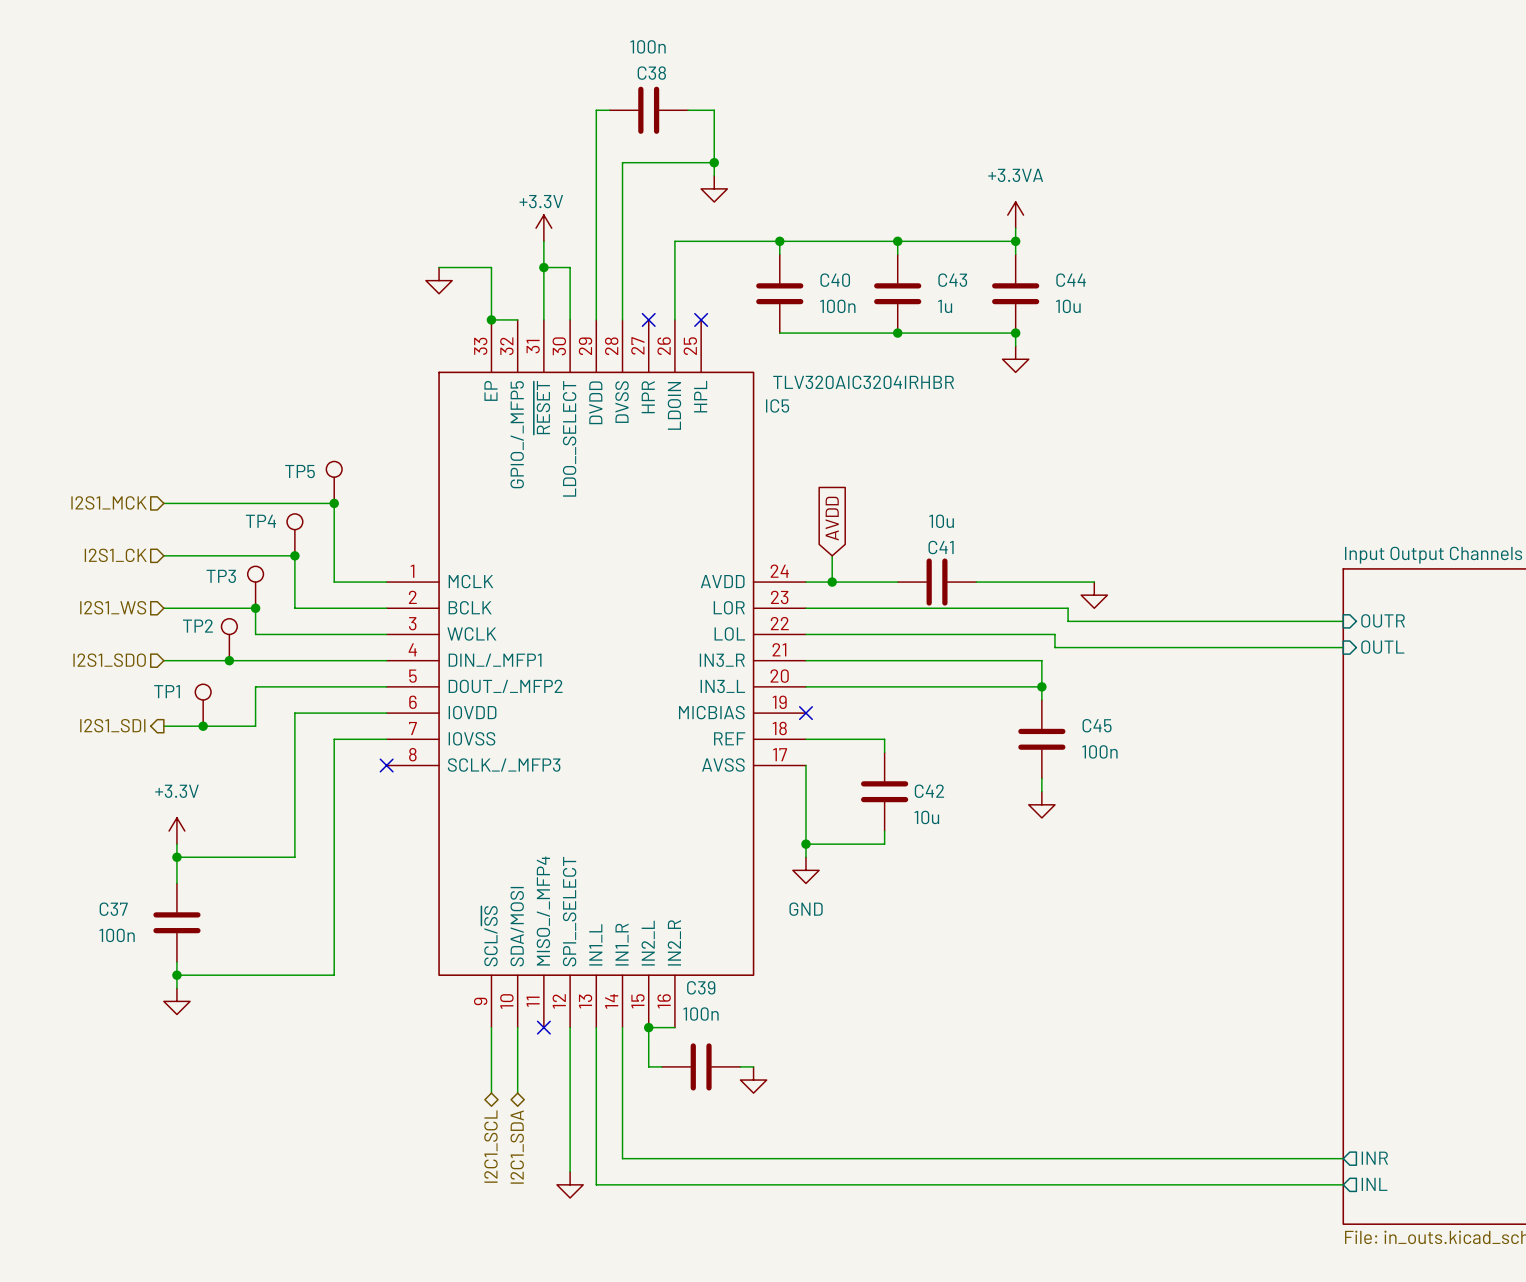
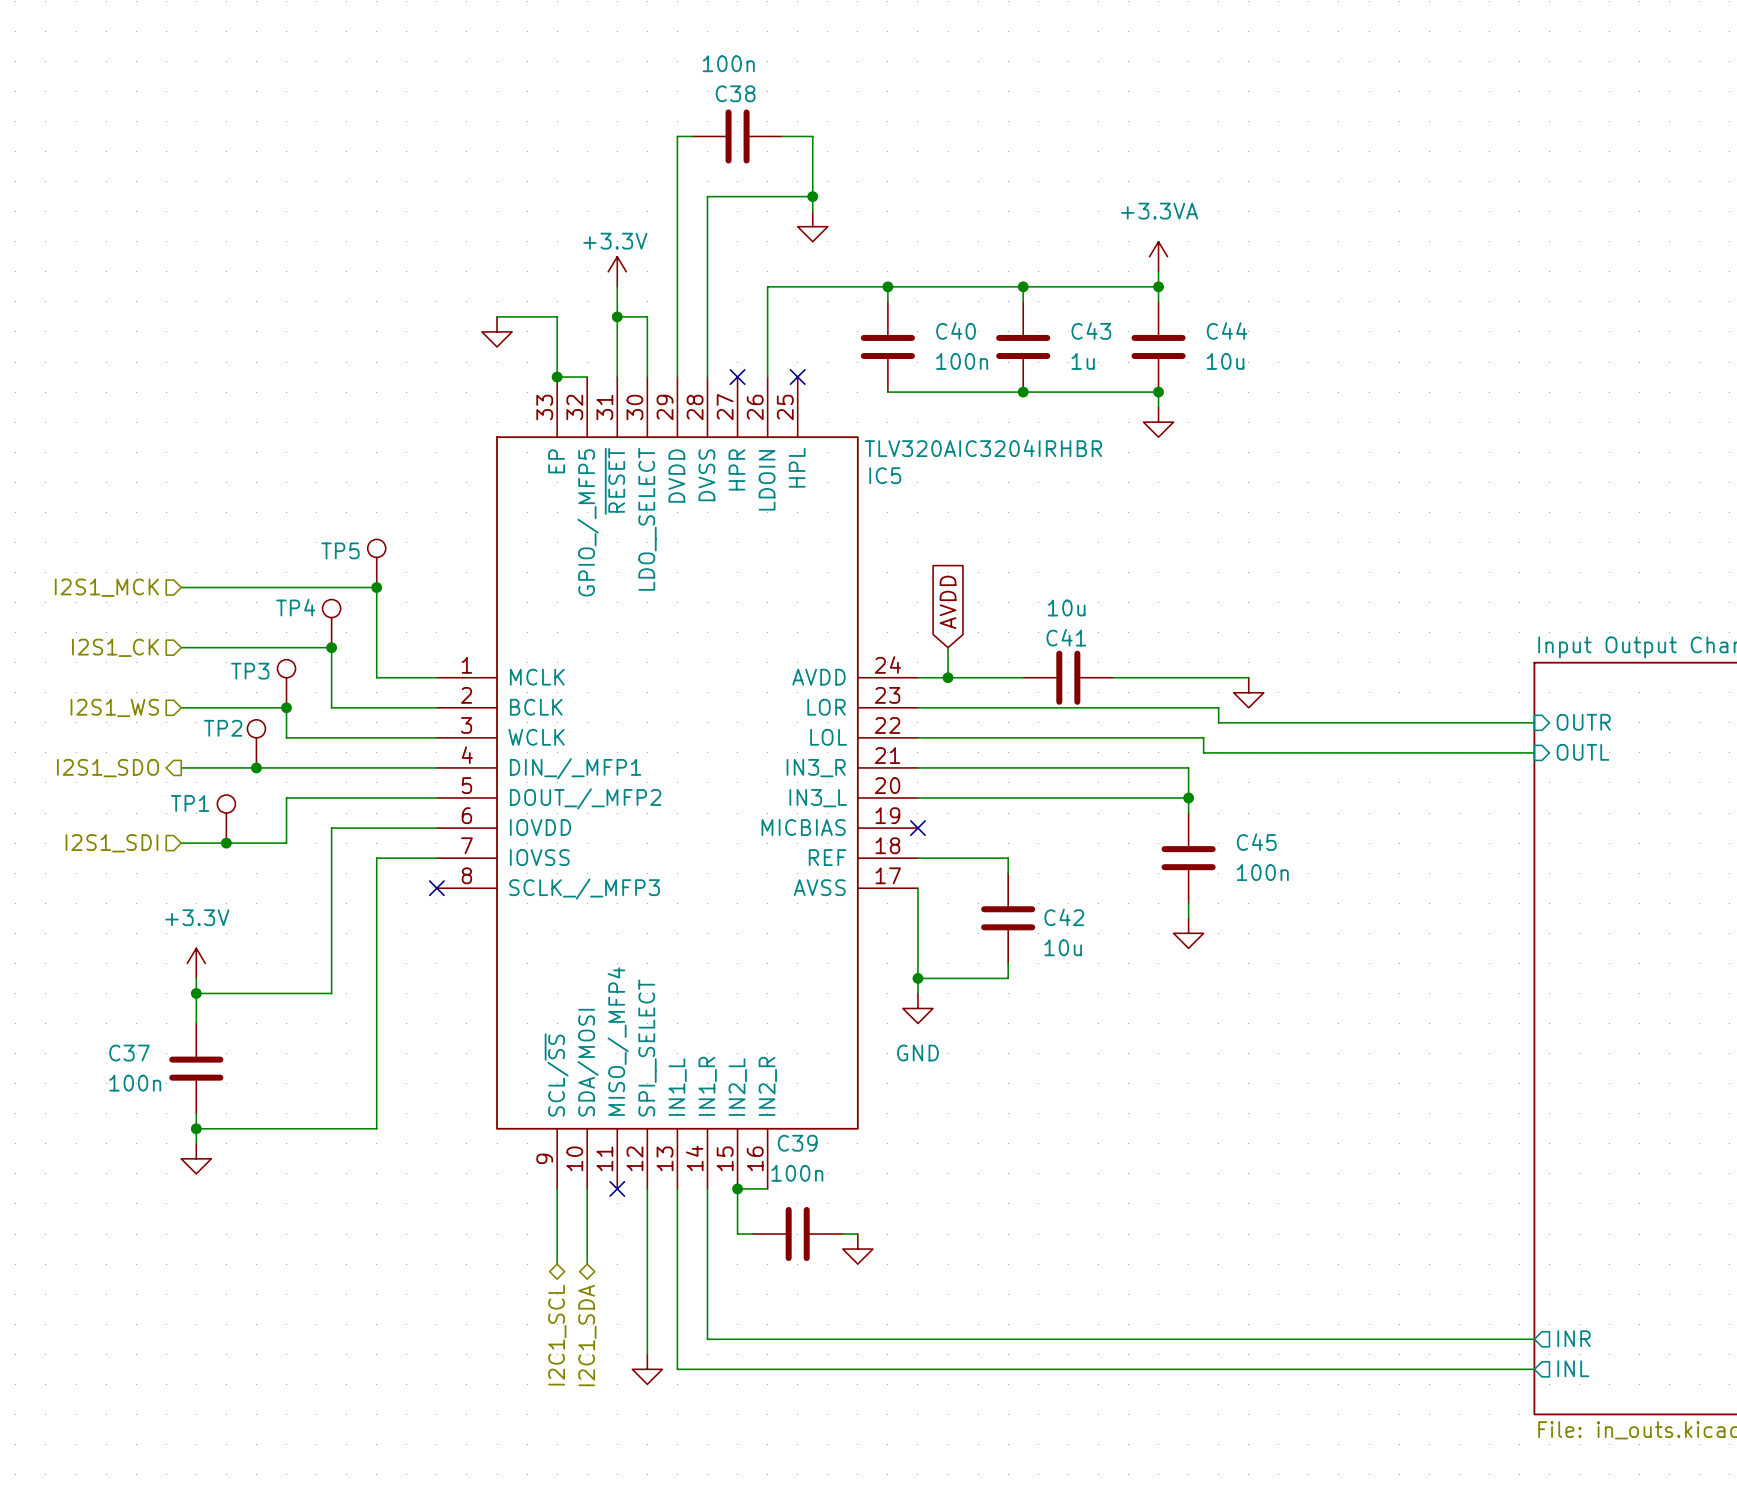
hierarchical label shape: input (109, 660) -> output (108, 768)
hierarchical label shape: output (112, 725) -> input (111, 843)

